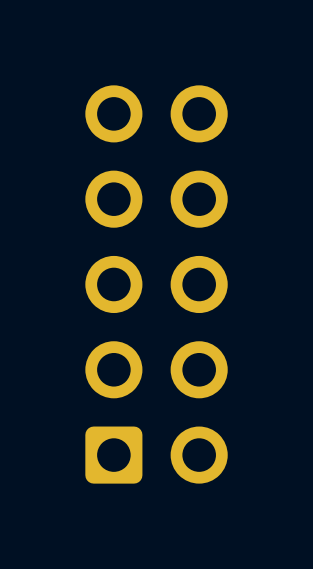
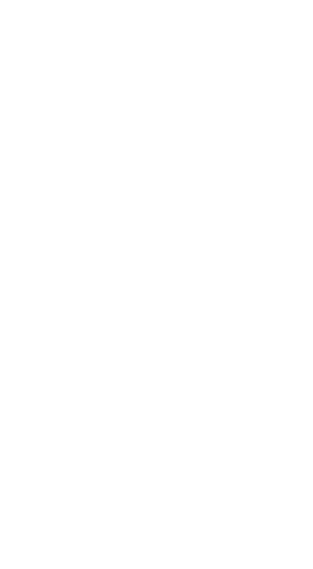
part: (156, 284) -> none

